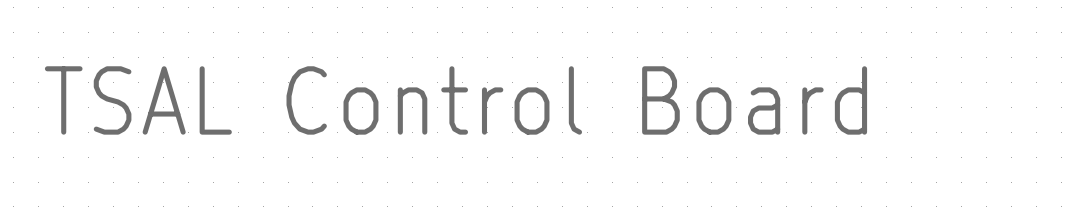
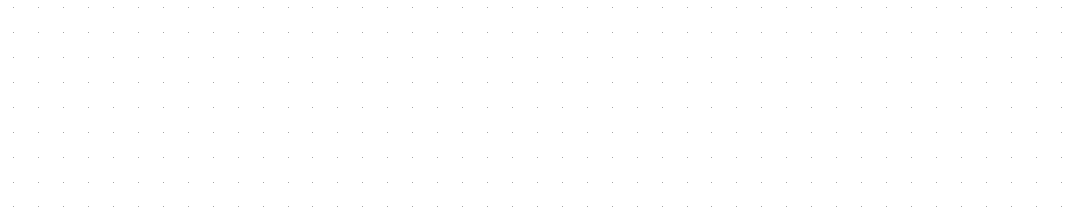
text: TSAL Control Board (455, 100) -> none

